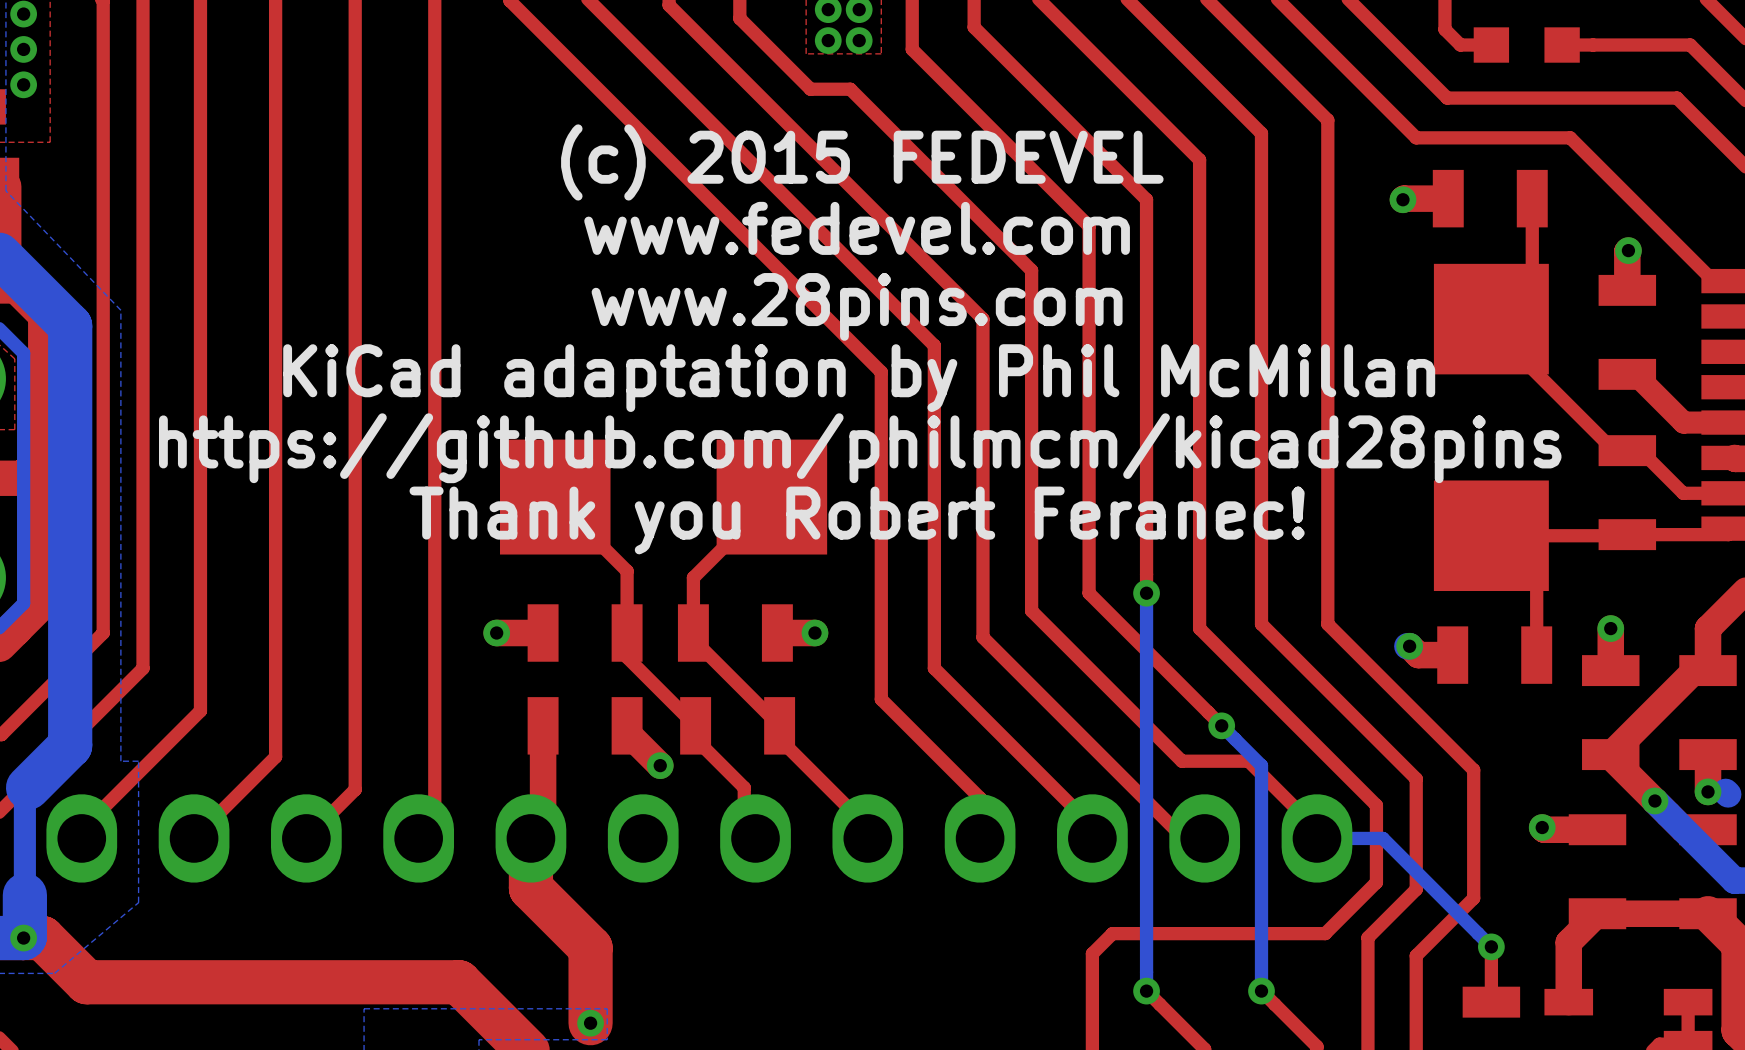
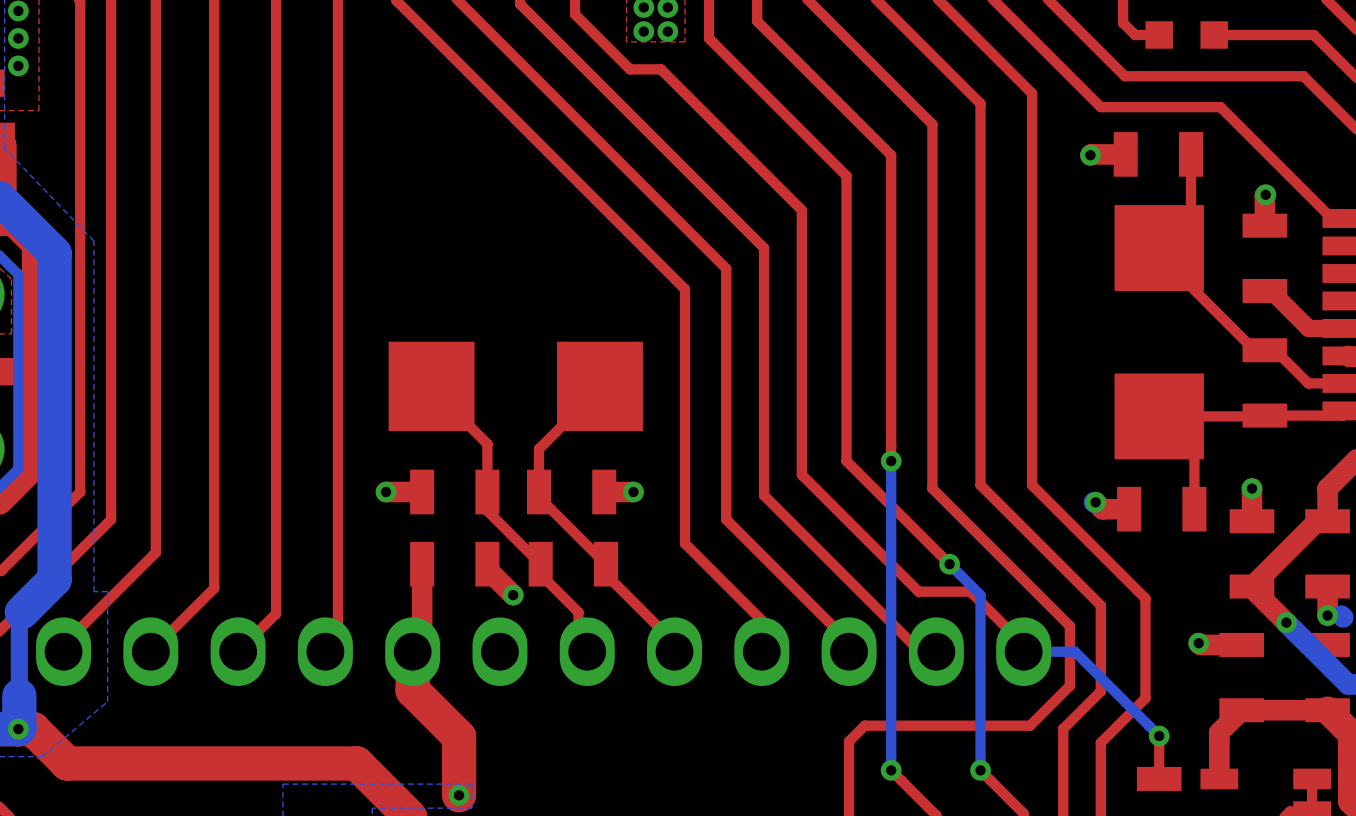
text: (c) 2015 FEDEVEL (862, 162) -> none
text: www.fedevel.com (857, 228) -> none
text: www.28pins.com (857, 306) -> none
text: KiCad adaptation by Phil McMillan (859, 378) -> none
text: https://github.com/philmcm/kicad28pins (860, 448) -> none
text: Thank you Robert Feranec! (857, 520) -> none

